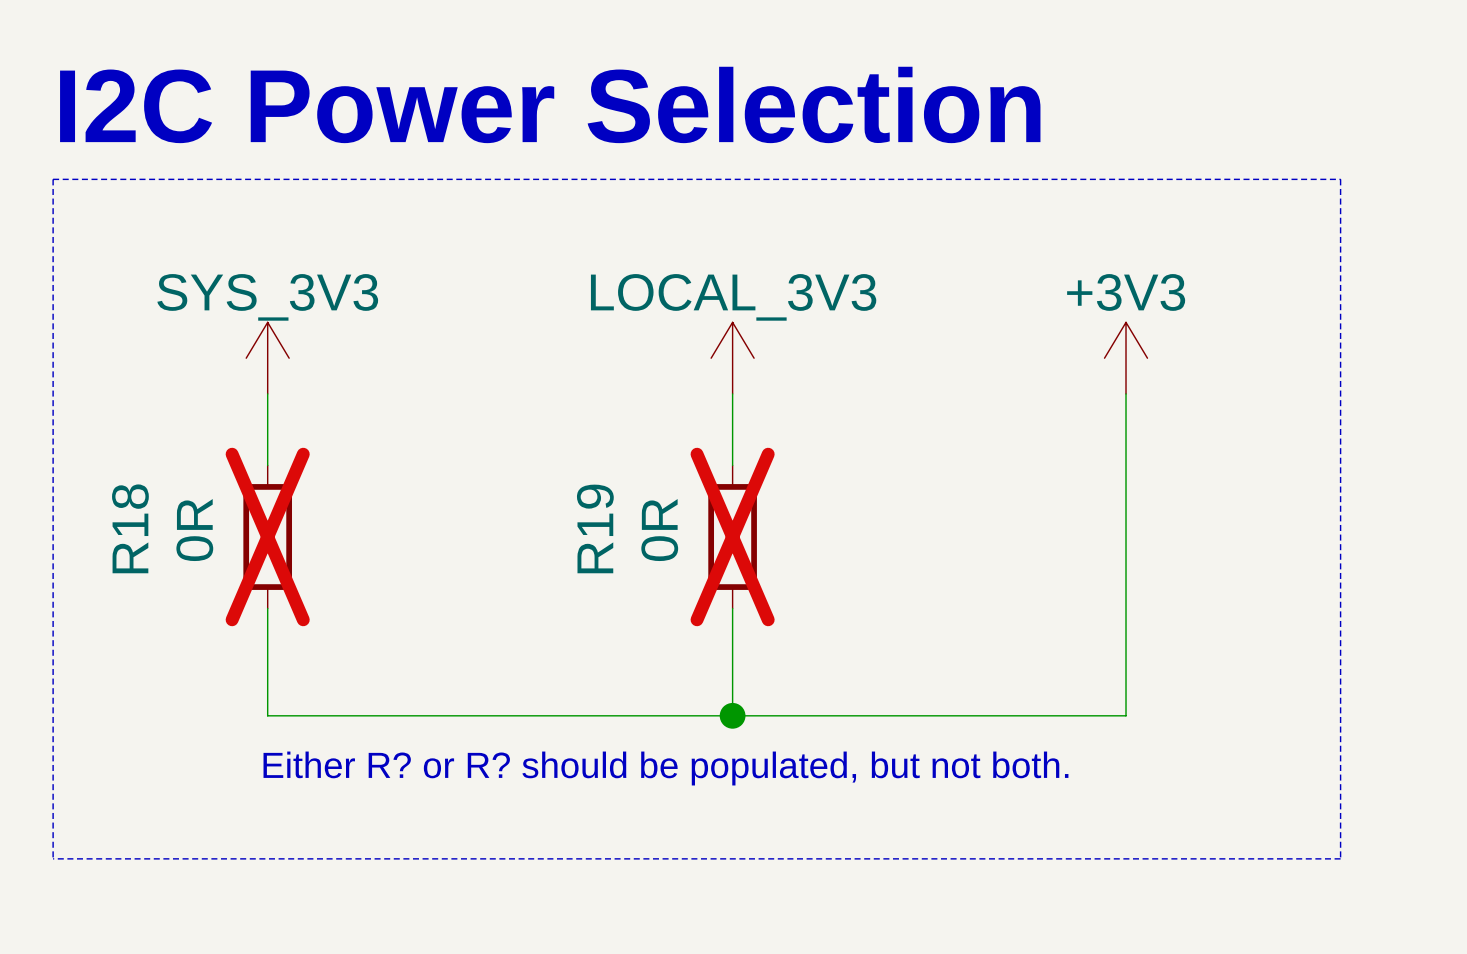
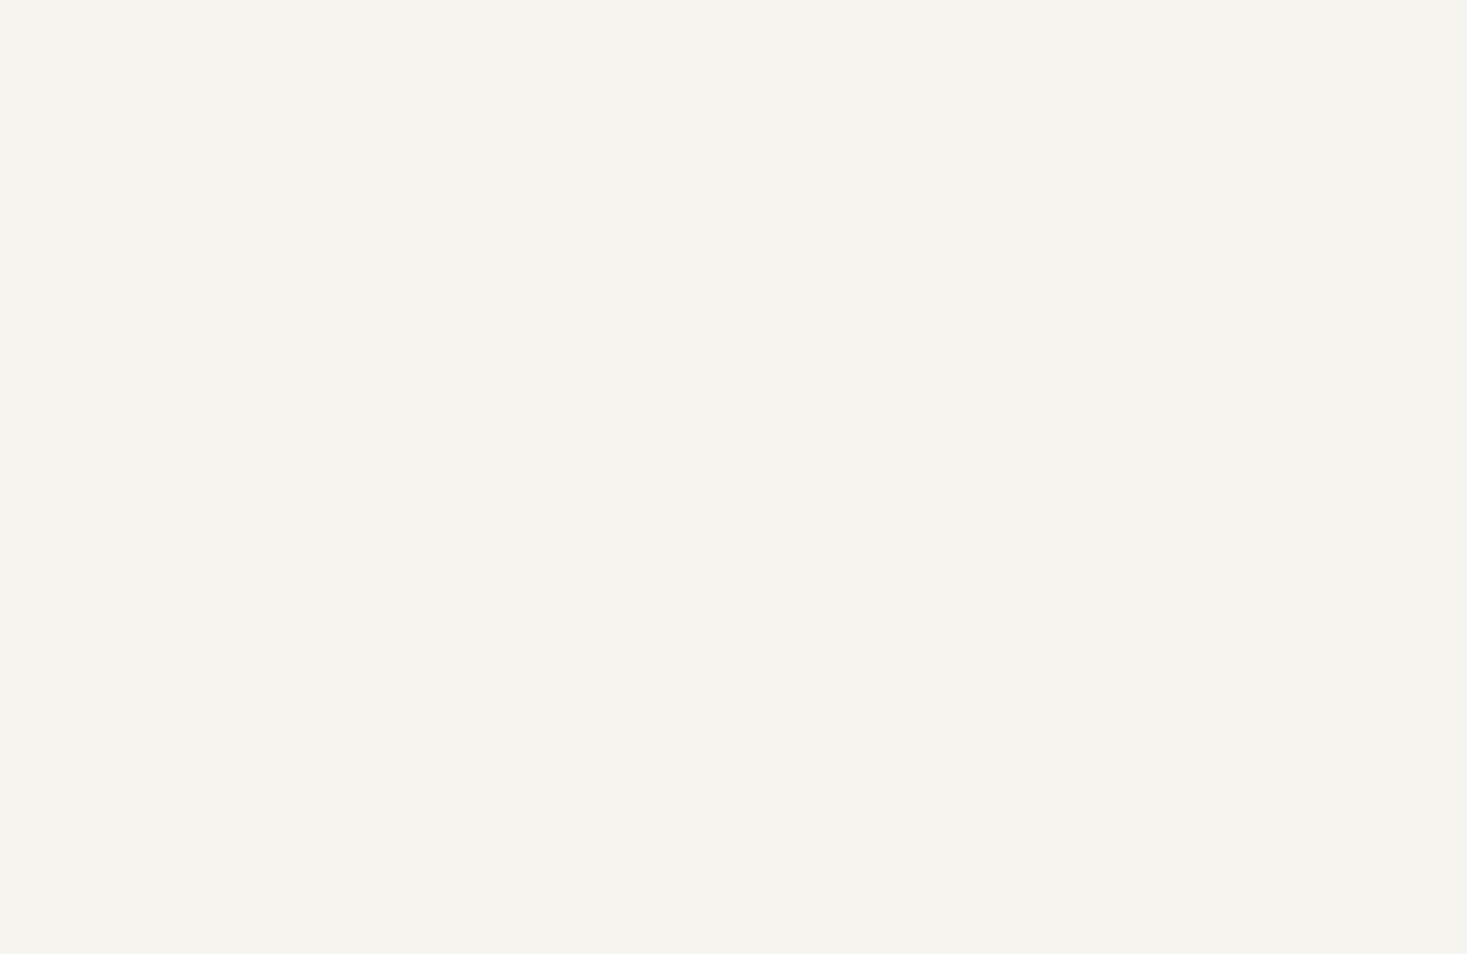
text: I2C Power Selection (550, 104) -> none
line: (53, 179) (53, 858) (1340, 858) (1340, 179) (53, 179) -> none
power symbol: SYS_3V3 (267, 358) -> none
power symbol: LOCAL_3V3 (732, 358) -> none
power symbol: +3V3 (1126, 358) -> none
wire: (267, 393) (267, 465) -> none
wire: (732, 393) (732, 465) -> none
wire: (1126, 393) (1126, 715) (267, 715) (267, 608) -> none
R18: 0R (267, 537) -> none
R19: 0R (732, 537) -> none
wire: (732, 608) (732, 715) -> none
junction: (732, 715) -> none
text: Either R? or R? should be populated, but not both. (665, 768) -> none

